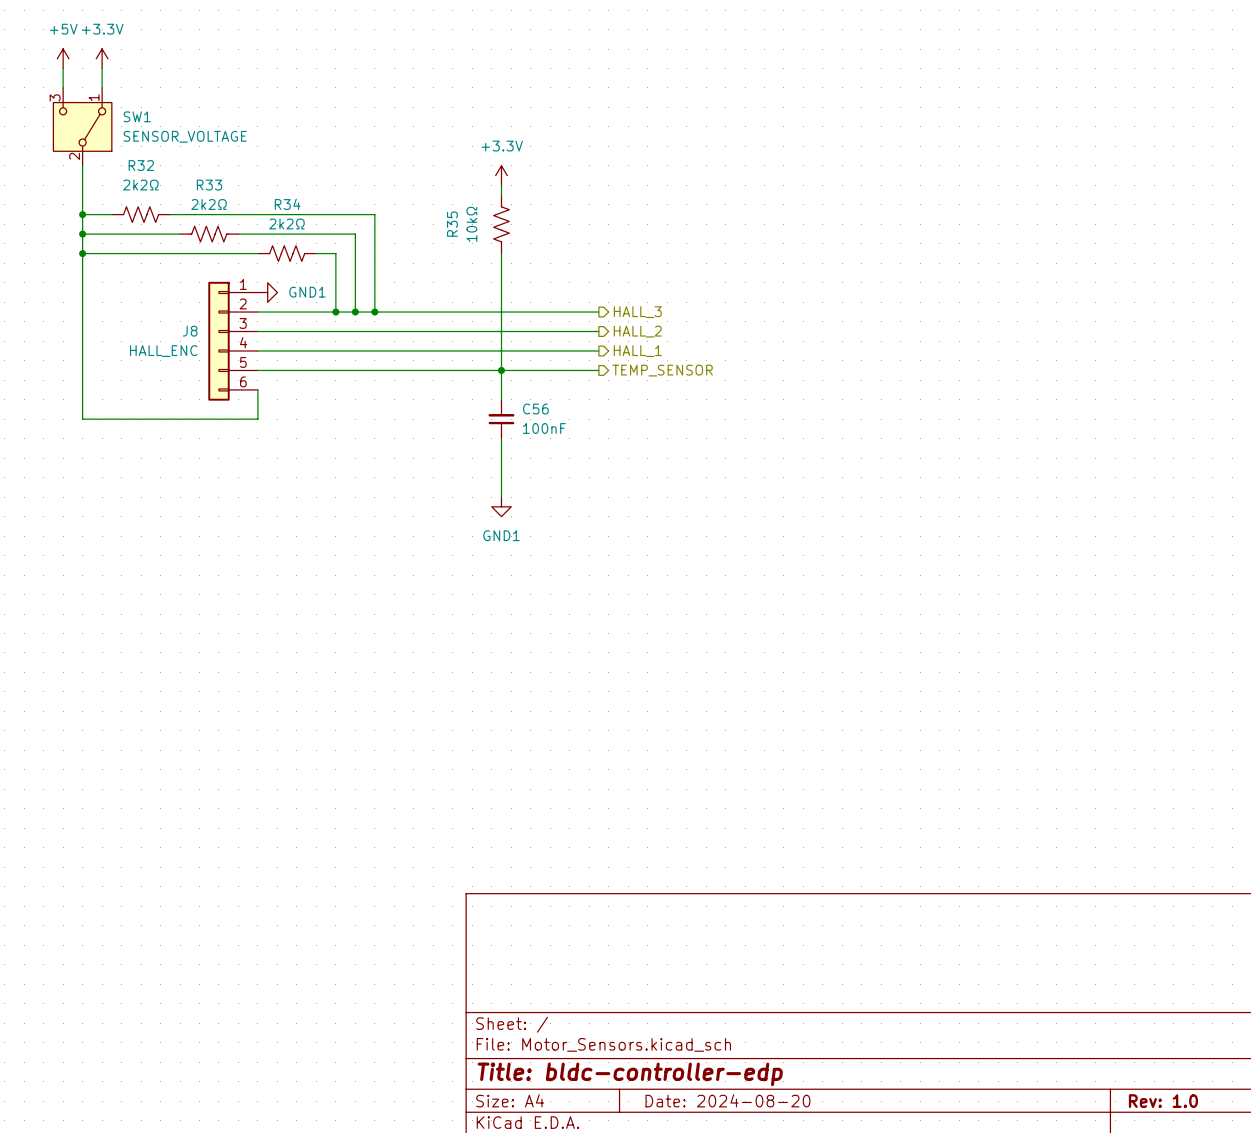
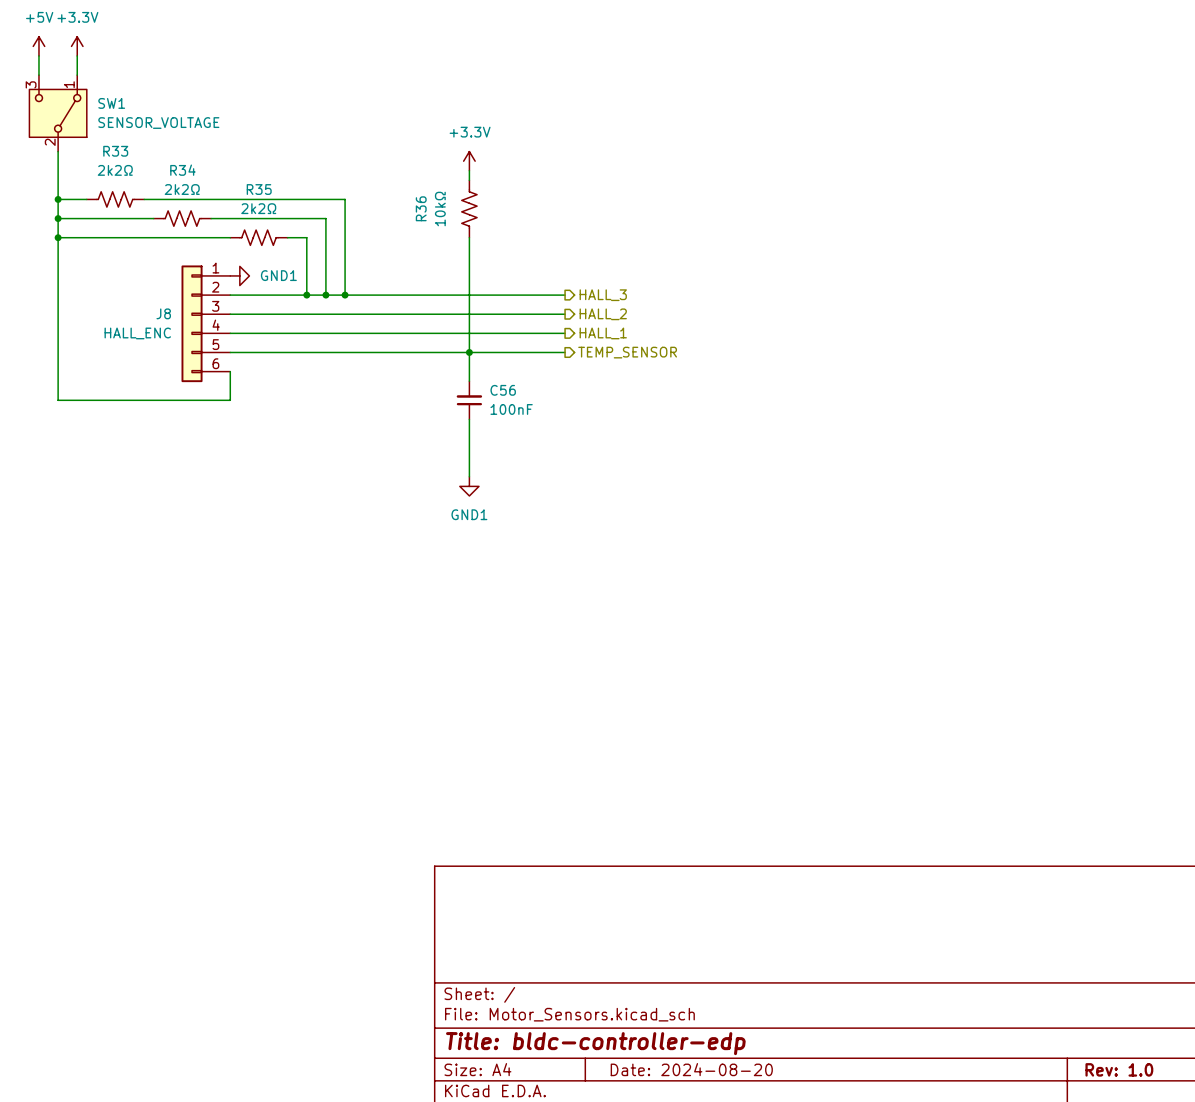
R32 name: R32 (141, 165) -> R33 (115, 151)
R33 name: R33 (209, 185) -> R34 (182, 170)
R34 name: R34 (287, 204) -> R35 (259, 189)
R35 name: R35 (452, 224) -> R36 (421, 208)

